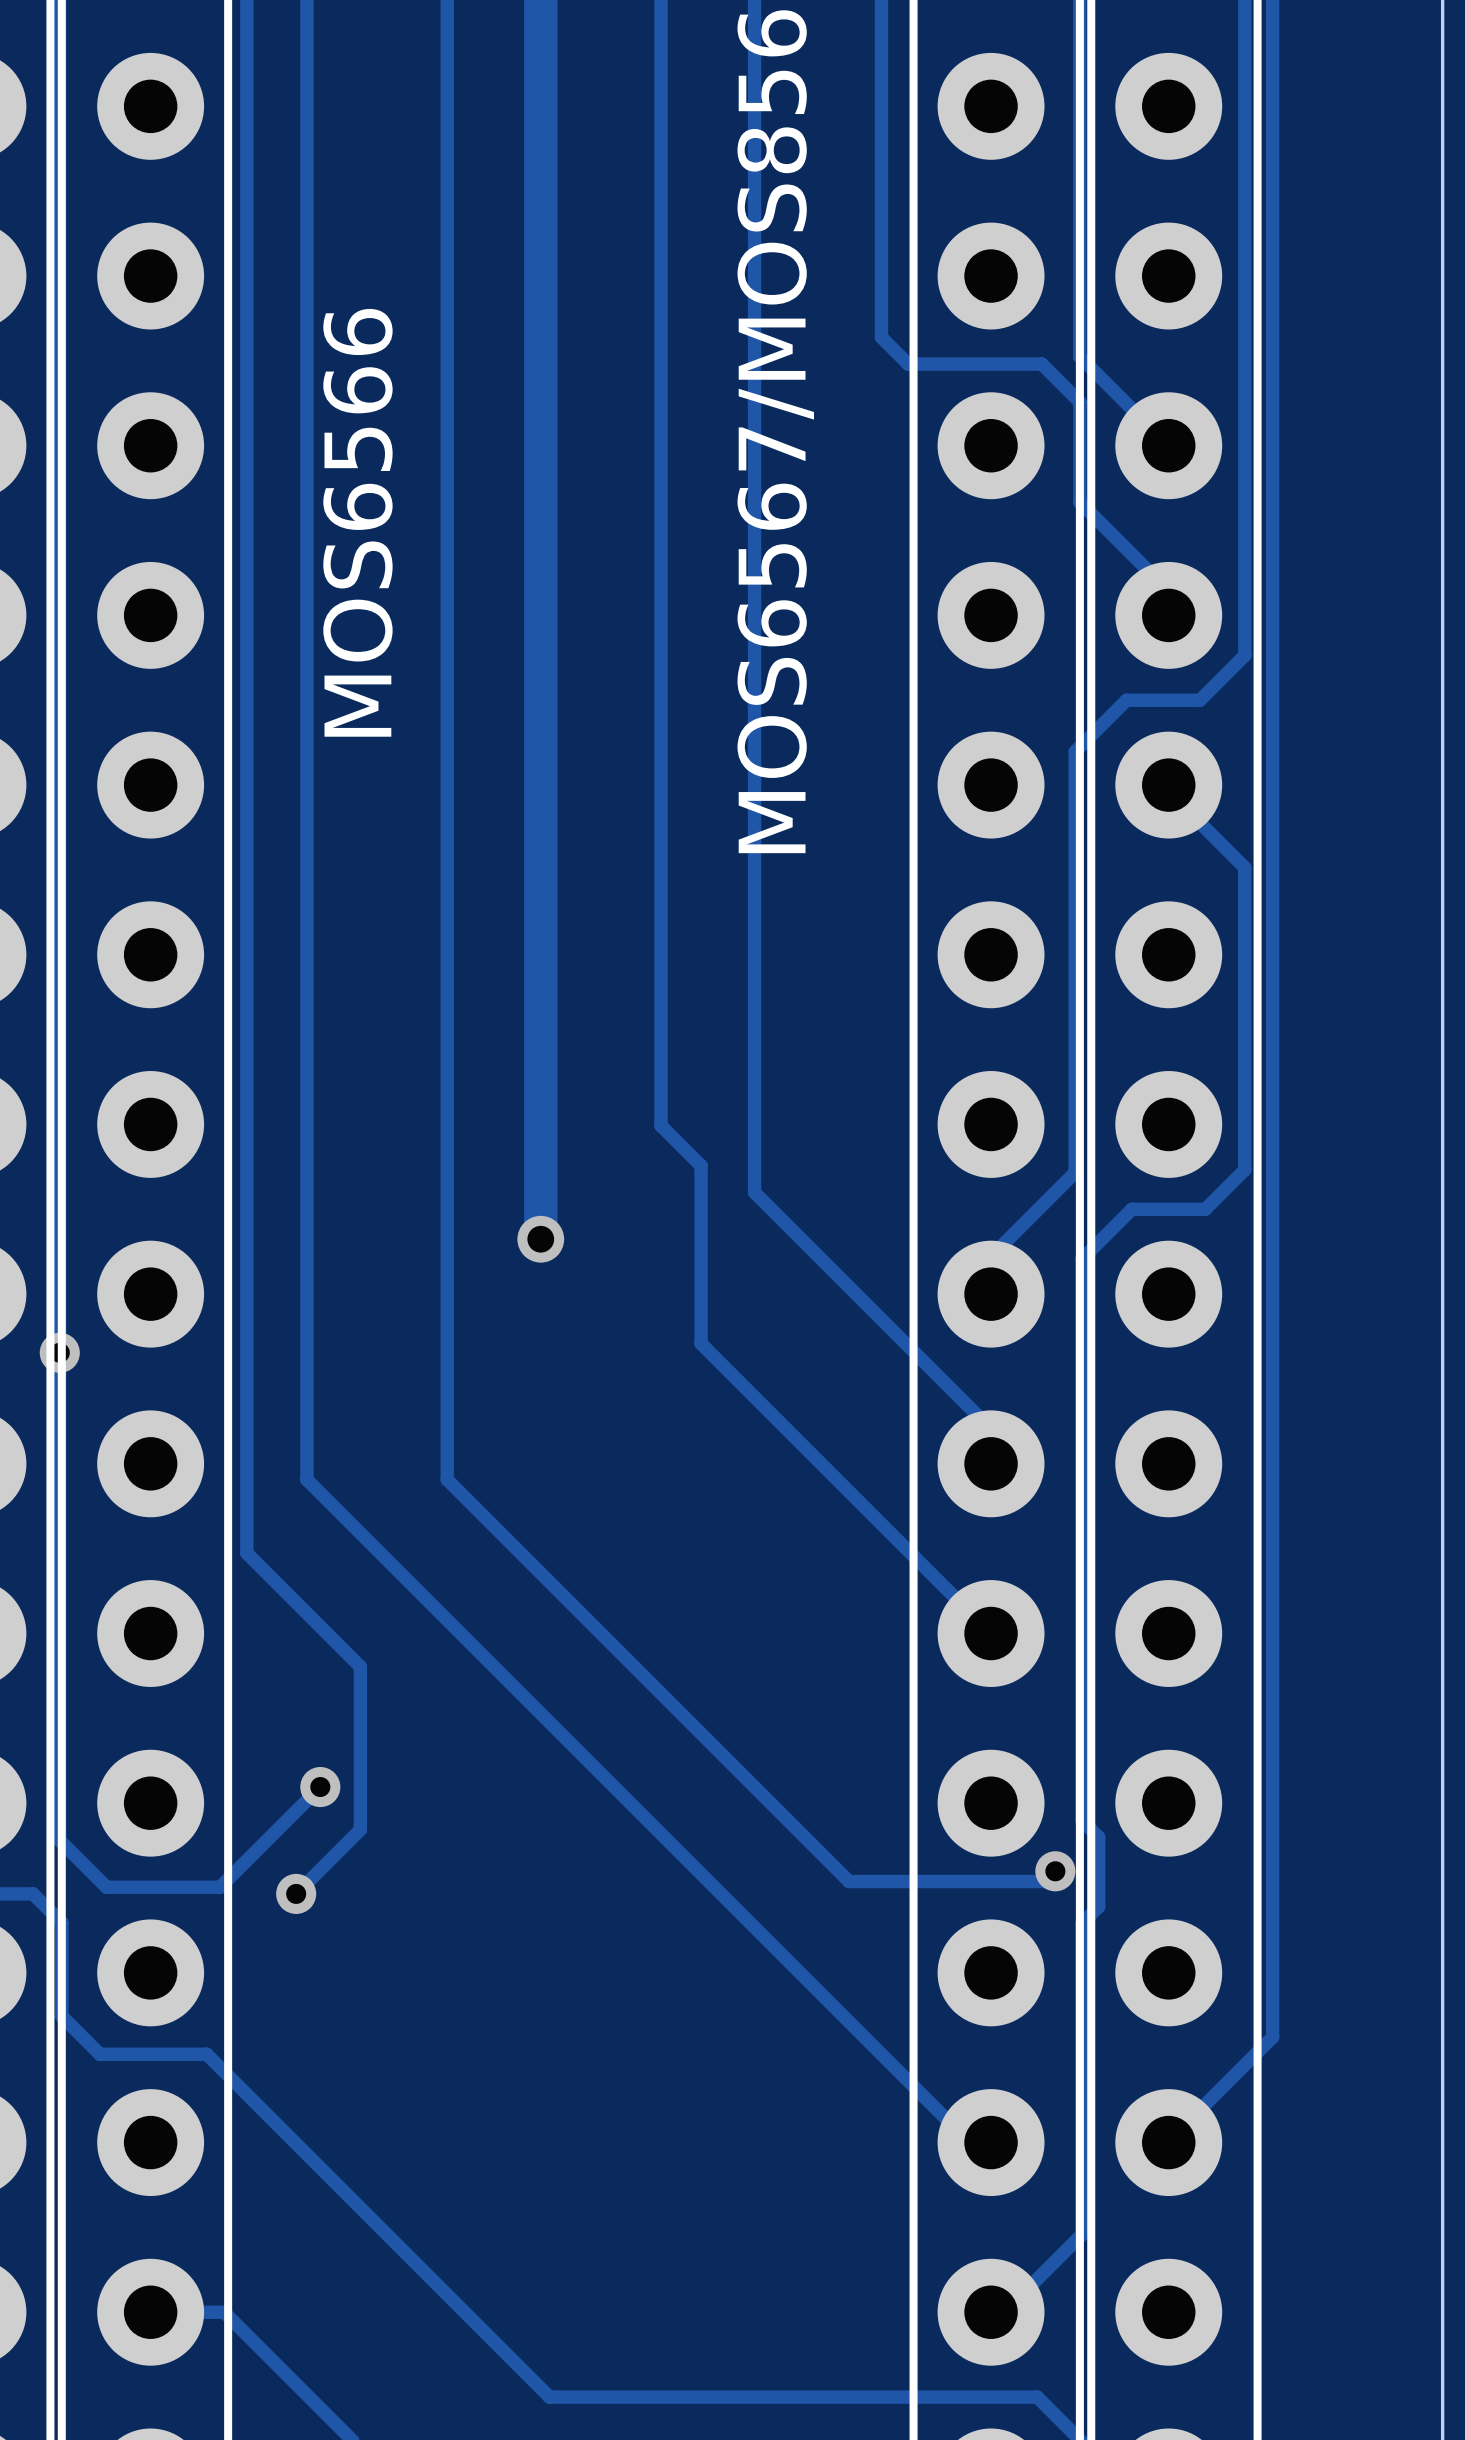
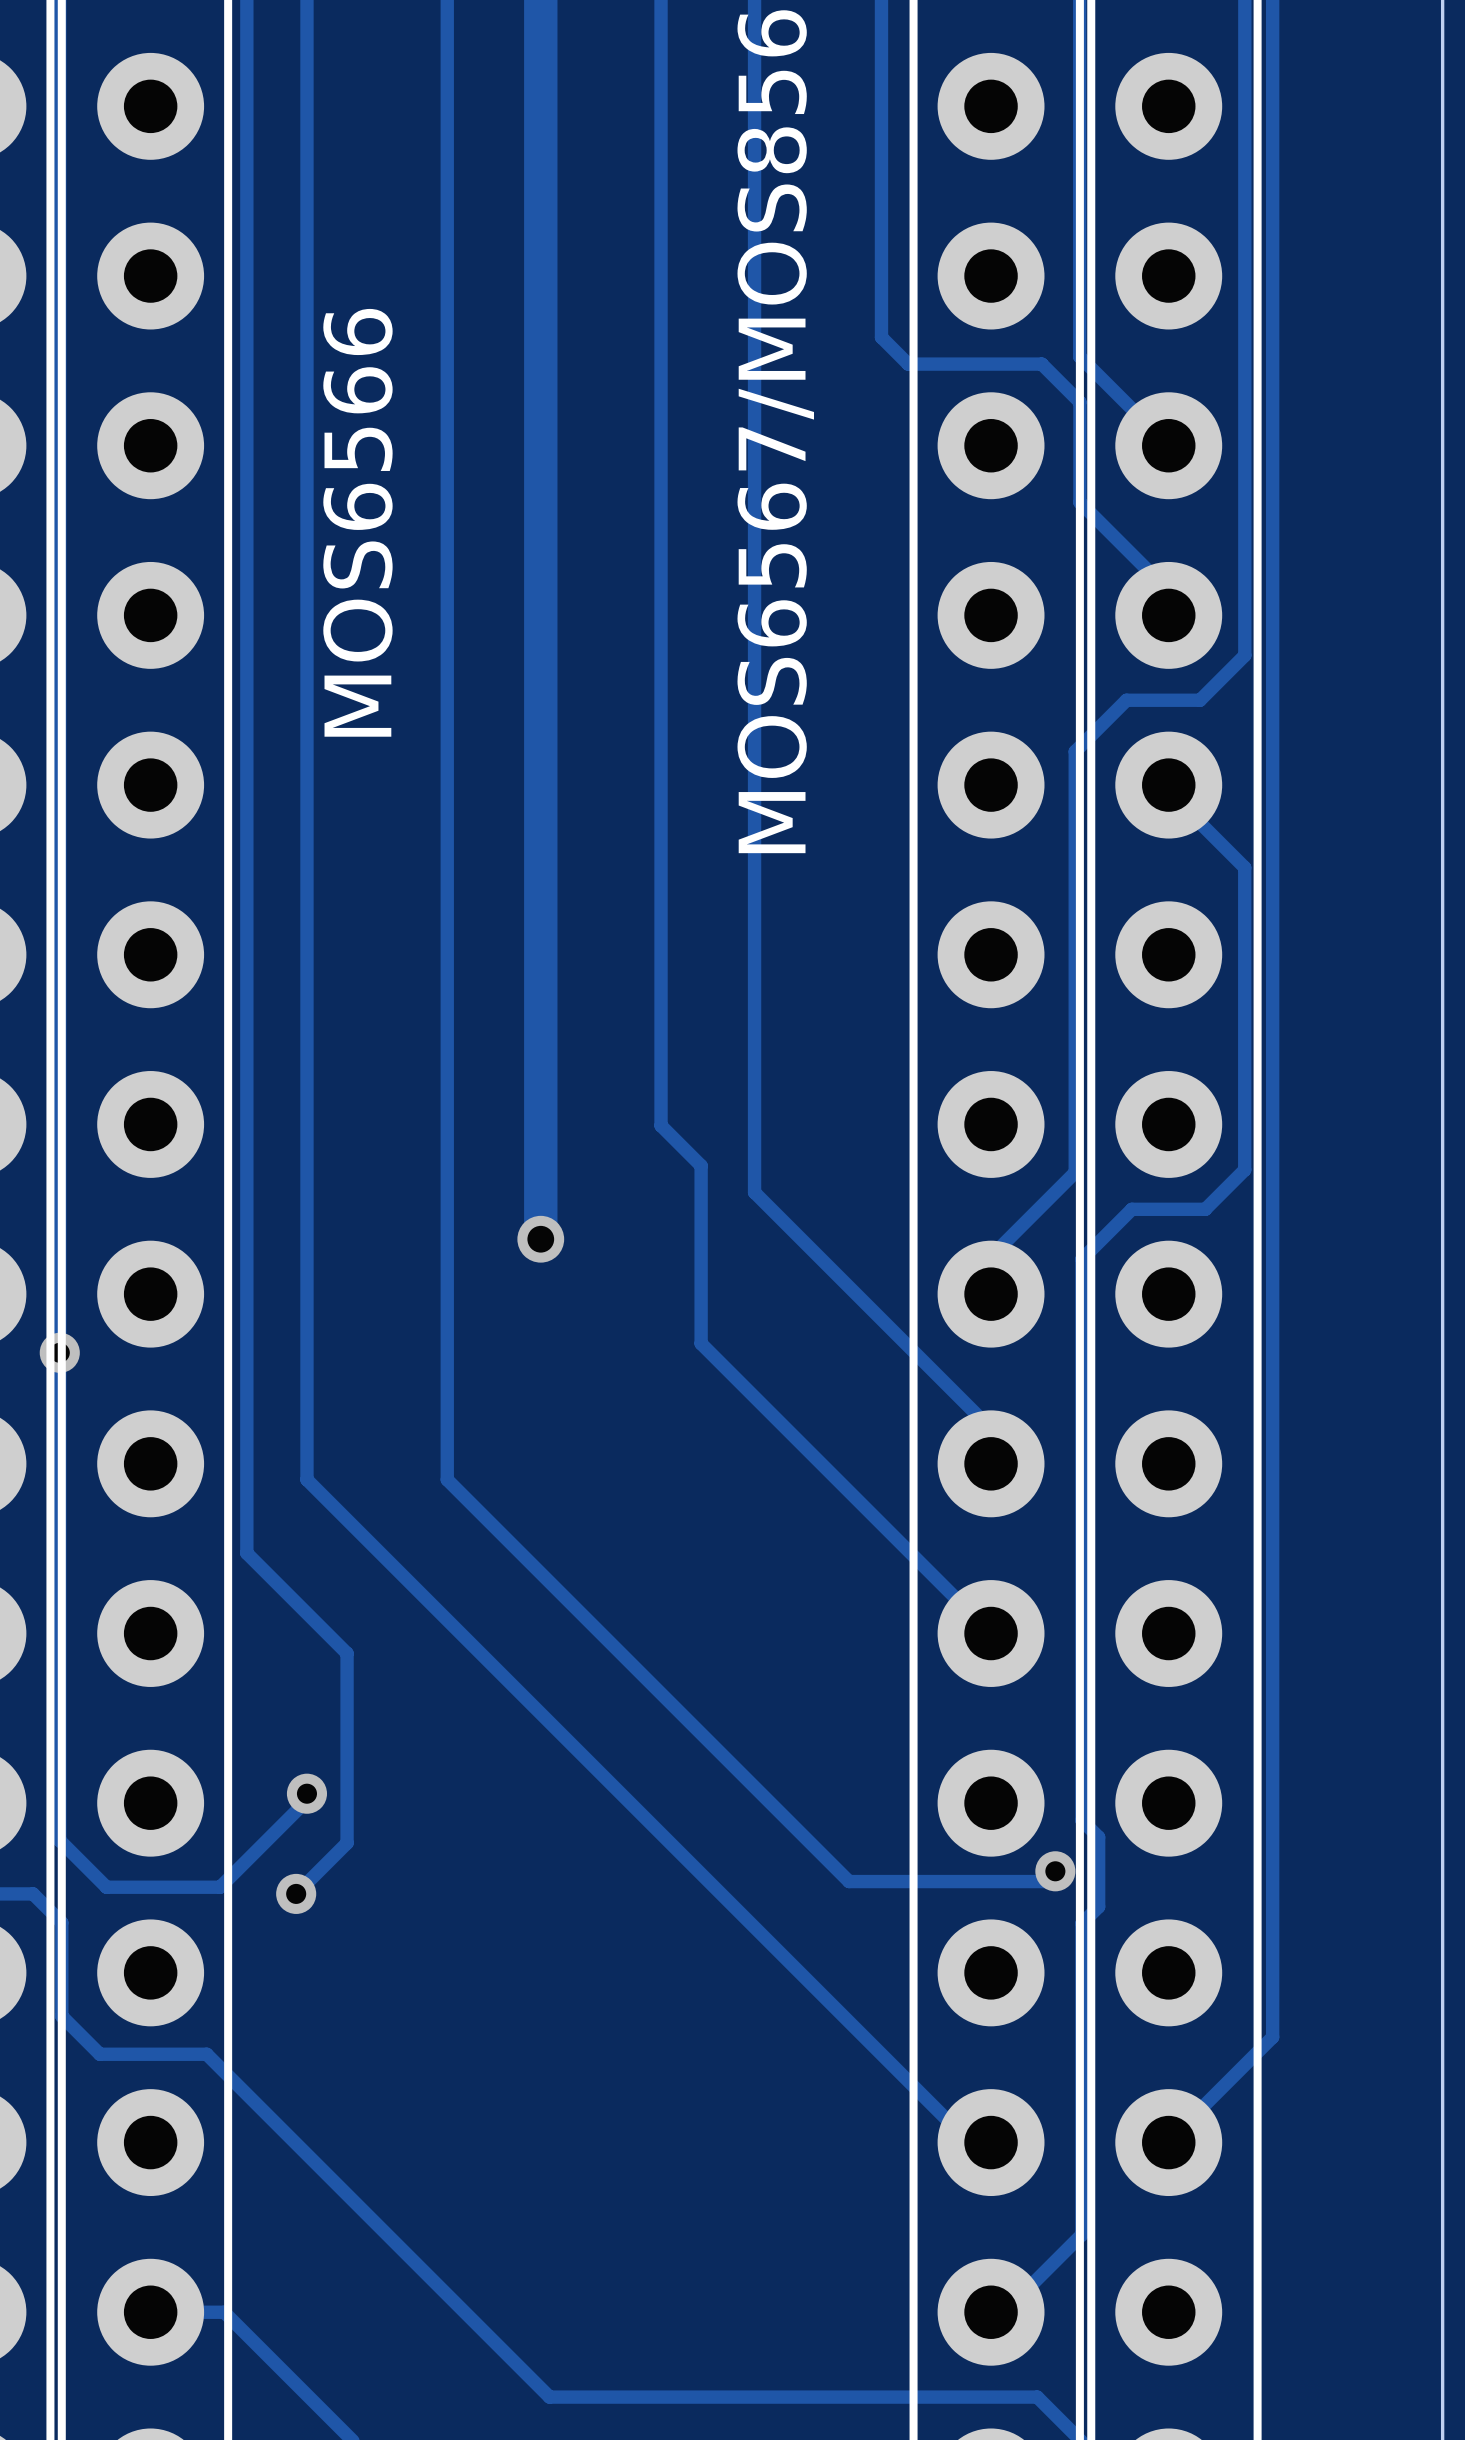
track: (347, 1653) (360, 1666) (360, 1829) (347, 1843) -> (347, 1653) (347, 1843)
via position: (320, 1787) -> (306, 1793)

